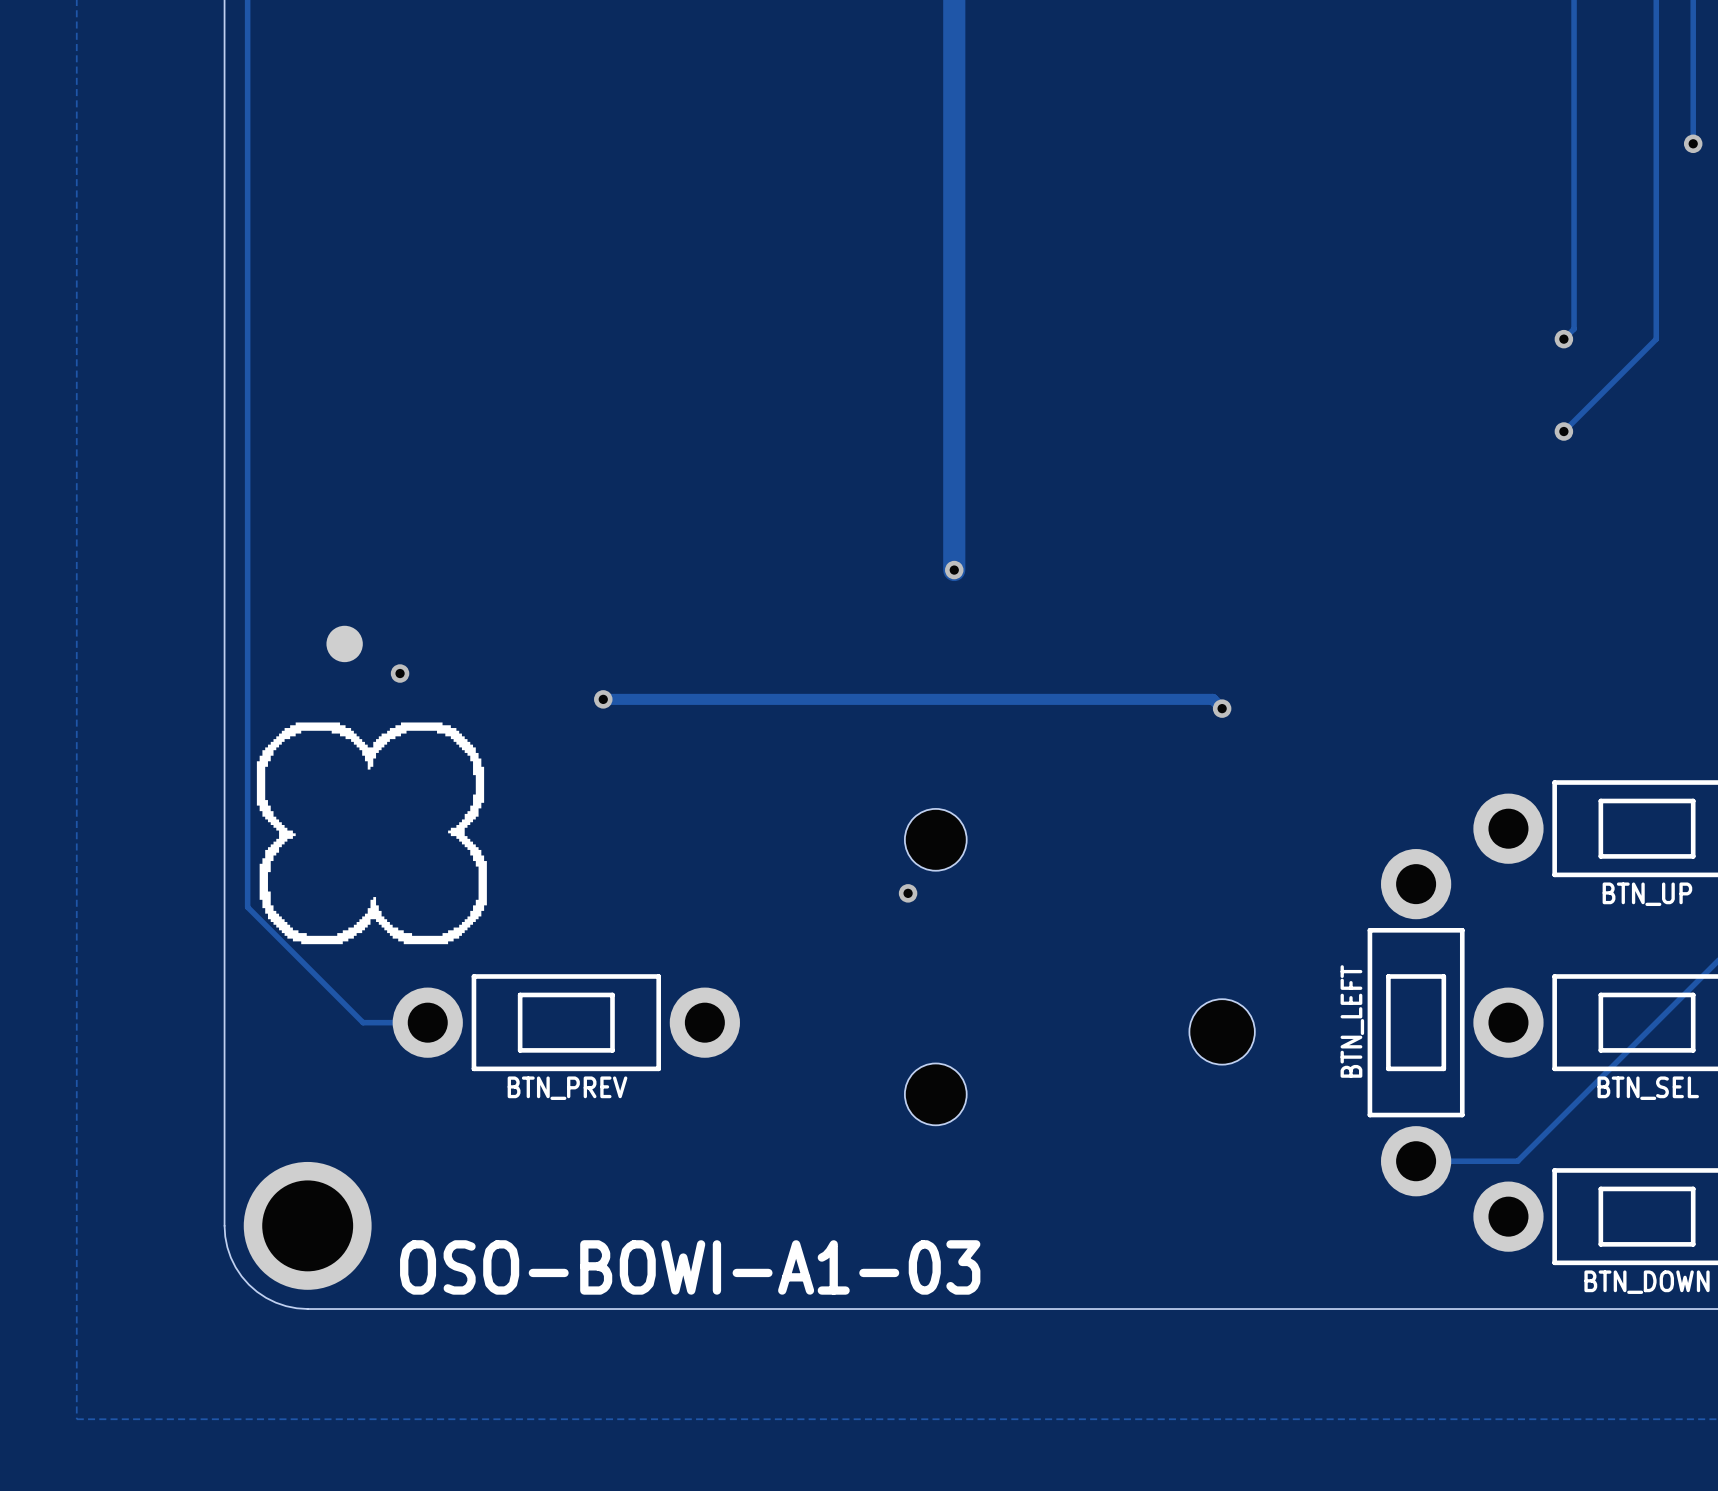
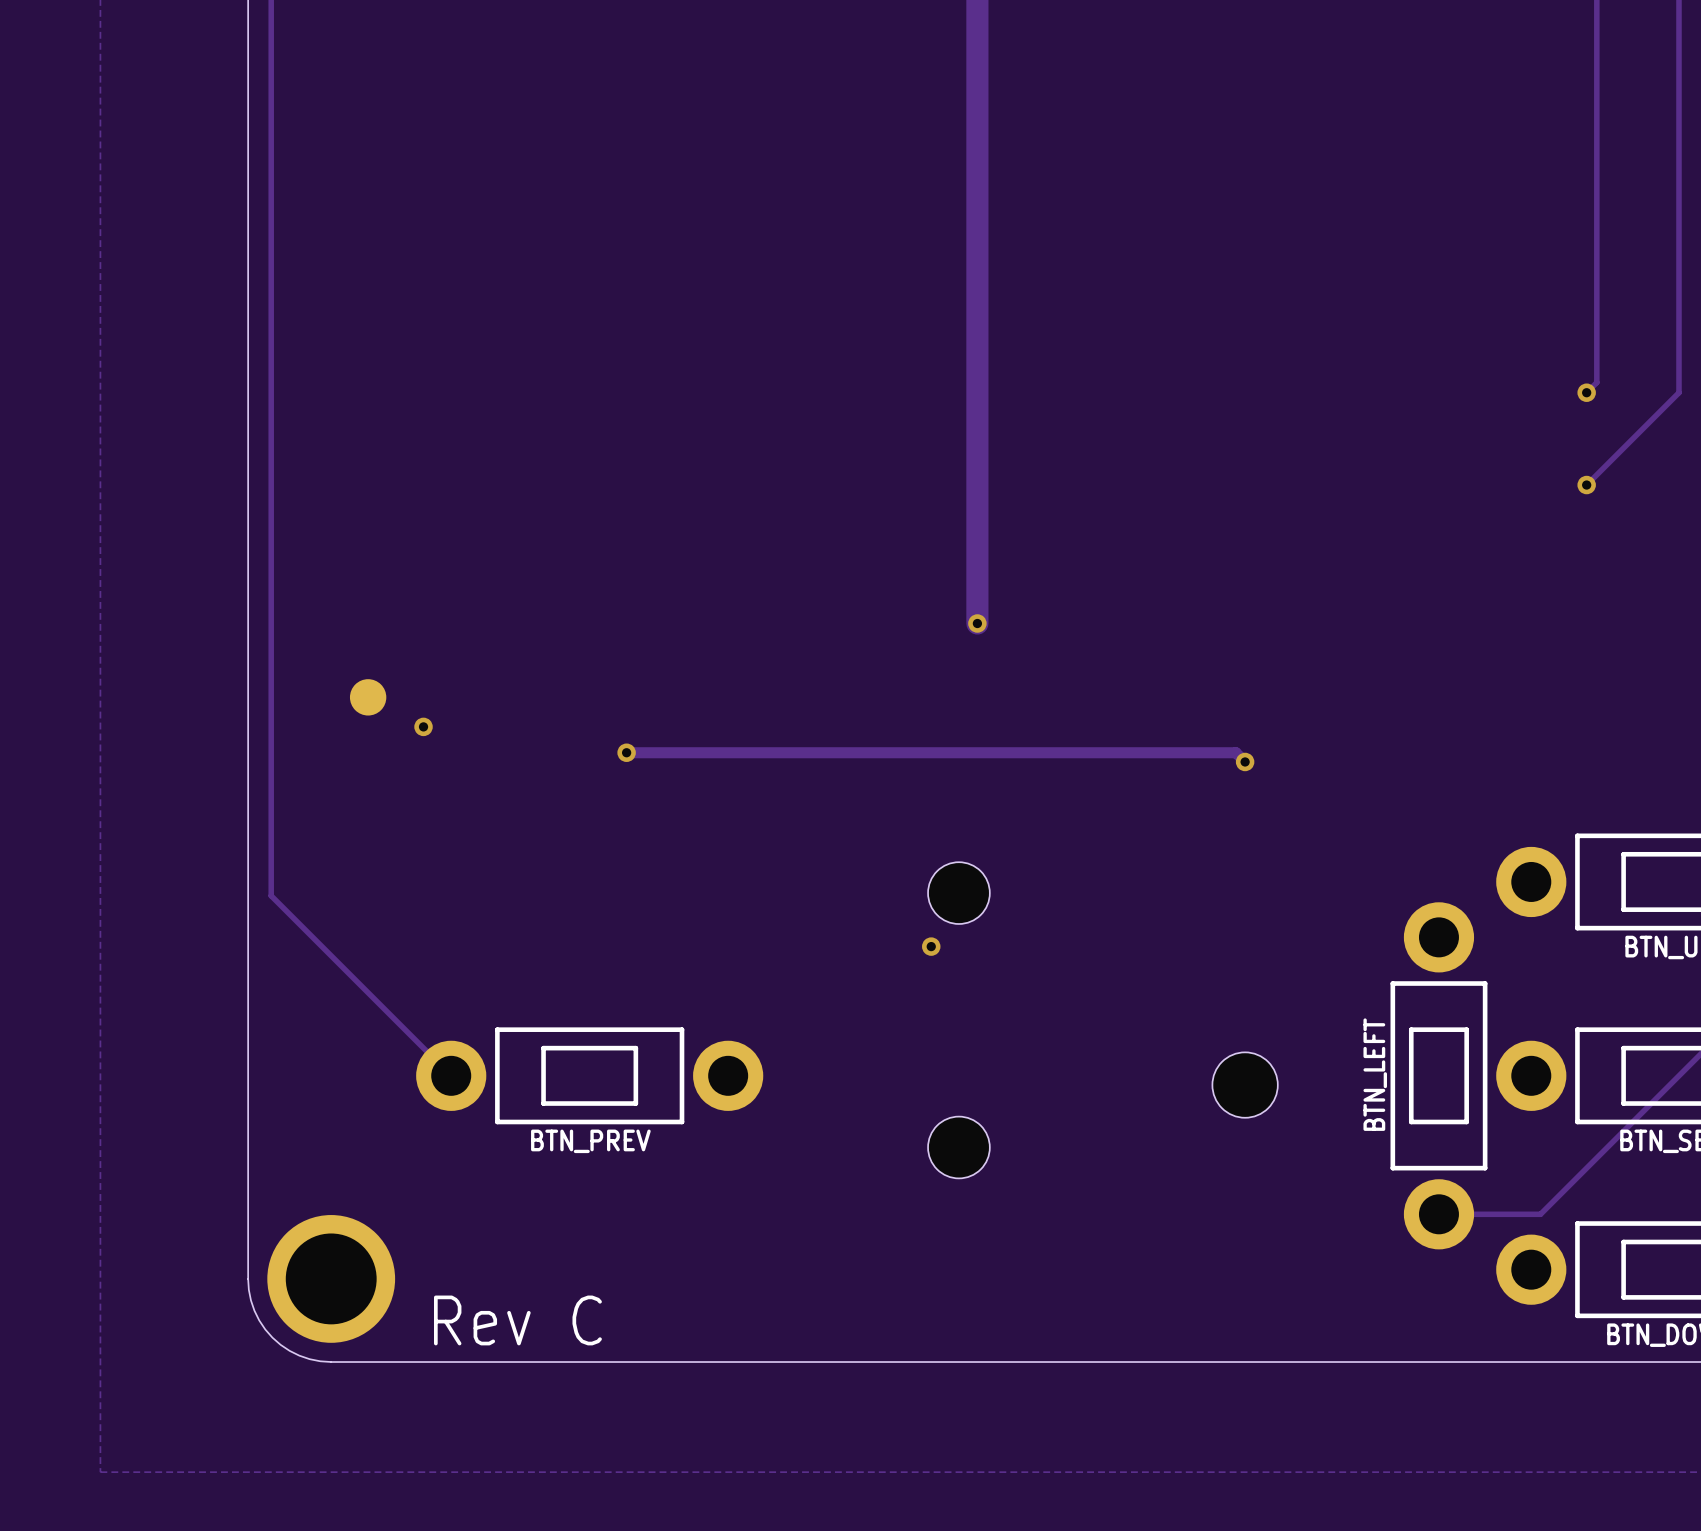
drawing: [256, 722, 487, 945] -> none
track: (247, 842) (247, 907) (363, 1022) (427, 1022) -> (271, 895) (451, 1075)
text: OSO-BOWI-A1-03 (690, 1267) -> Rev C (517, 1320)

